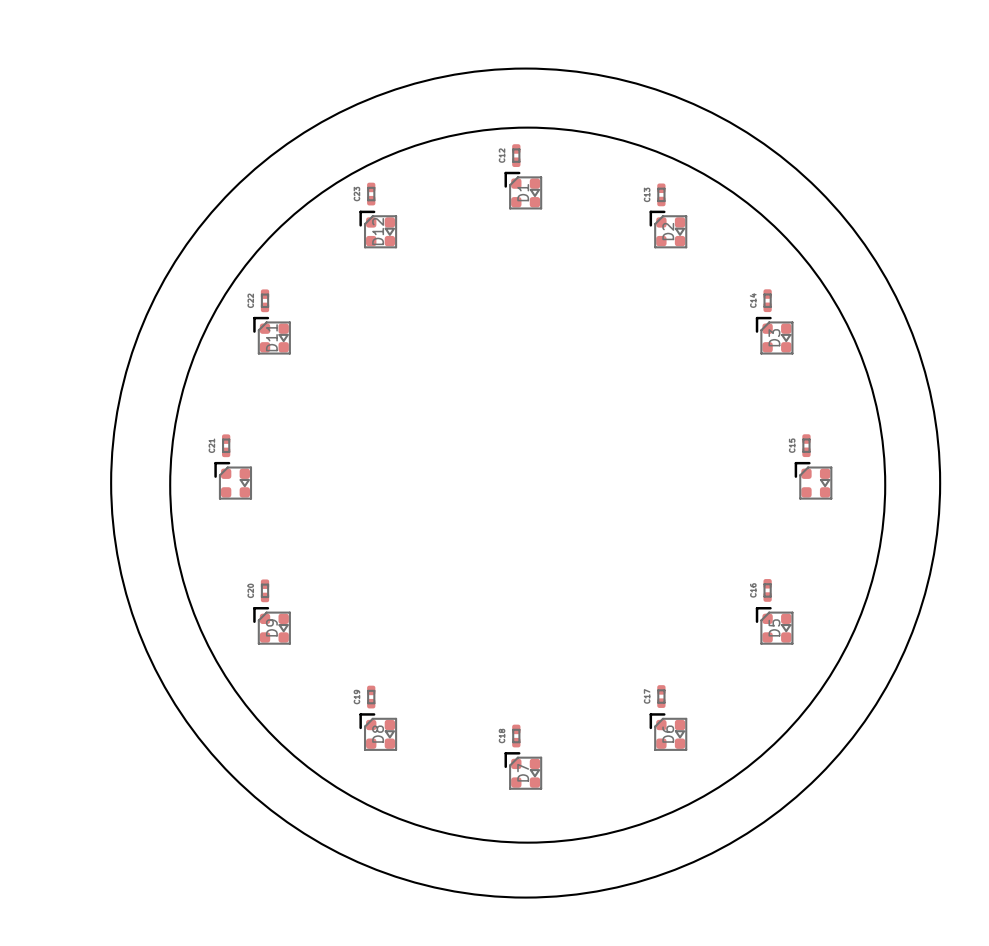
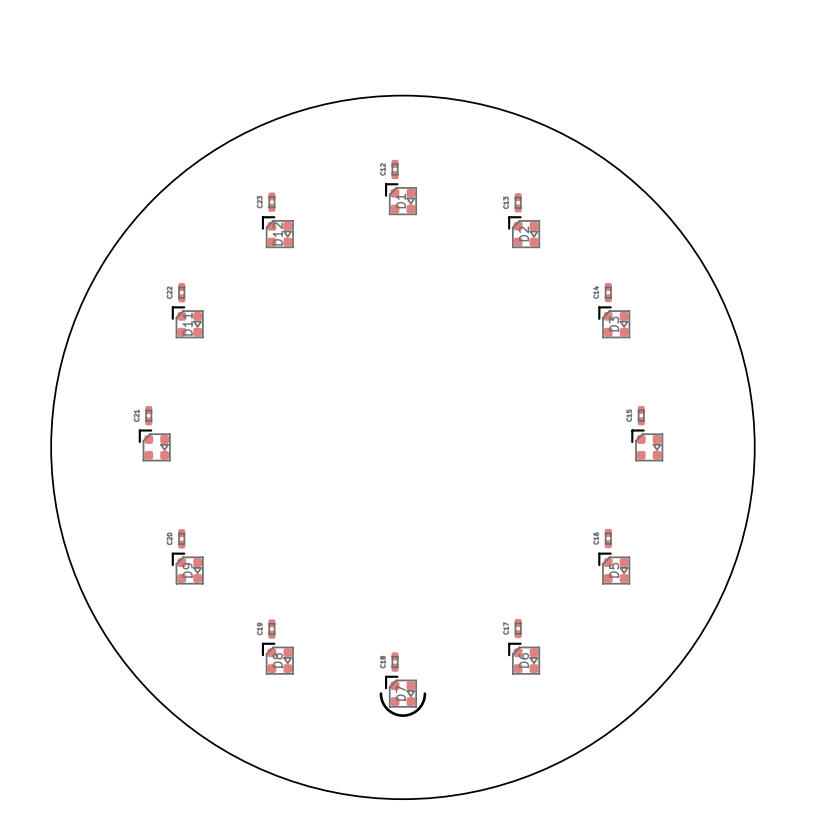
drawing: [169, 126, 887, 844] -> none
line: none -> (380, 693) (382, 702) (387, 709) (394, 713) (402, 715) (411, 713) (418, 709) (423, 702) (424, 693)

